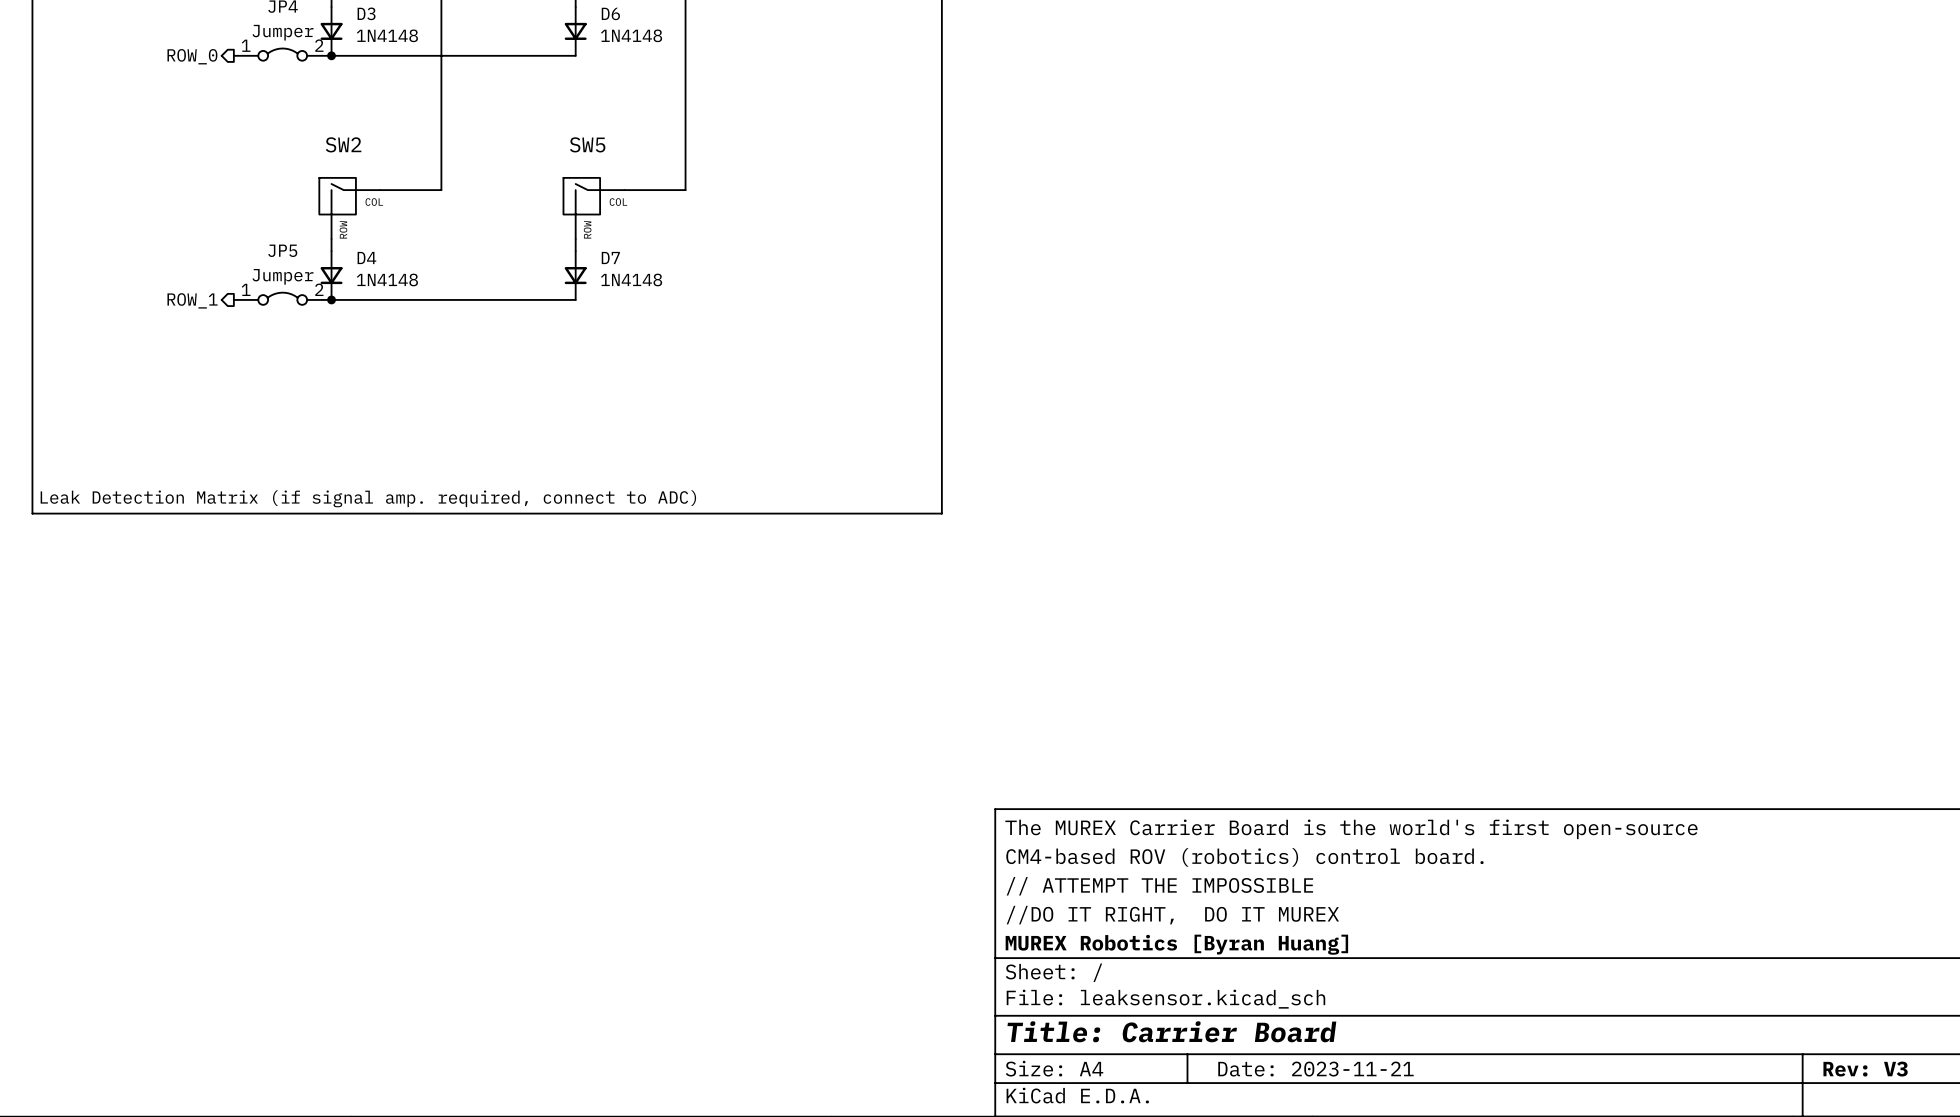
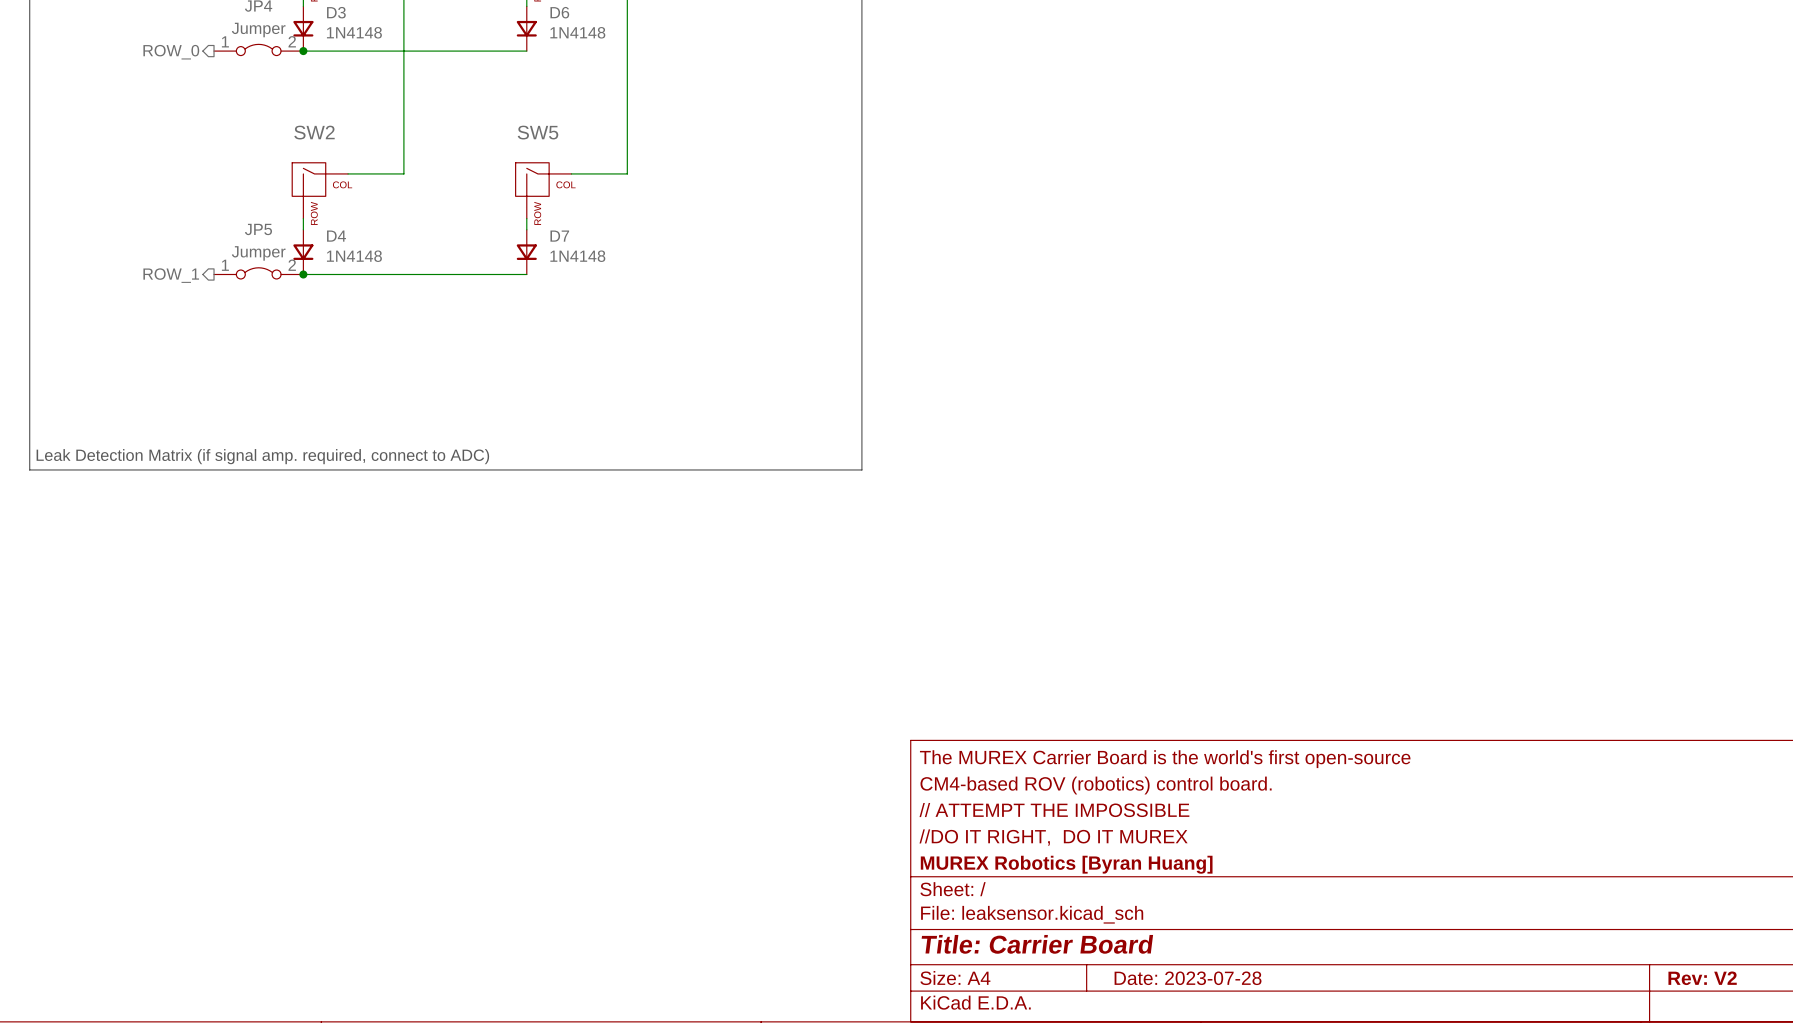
title block: Date: 2023-11-21 (1315, 1069) -> Date: 2023-07-28 (1188, 978)
title block: Rev: V3 (1865, 1069) -> Rev: V2 (1702, 978)

